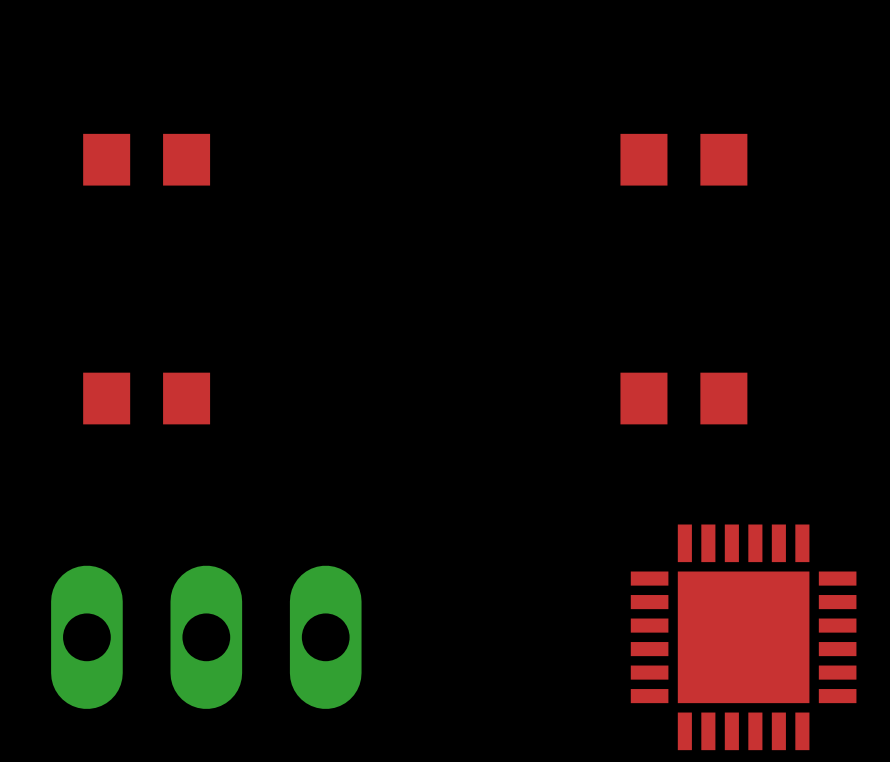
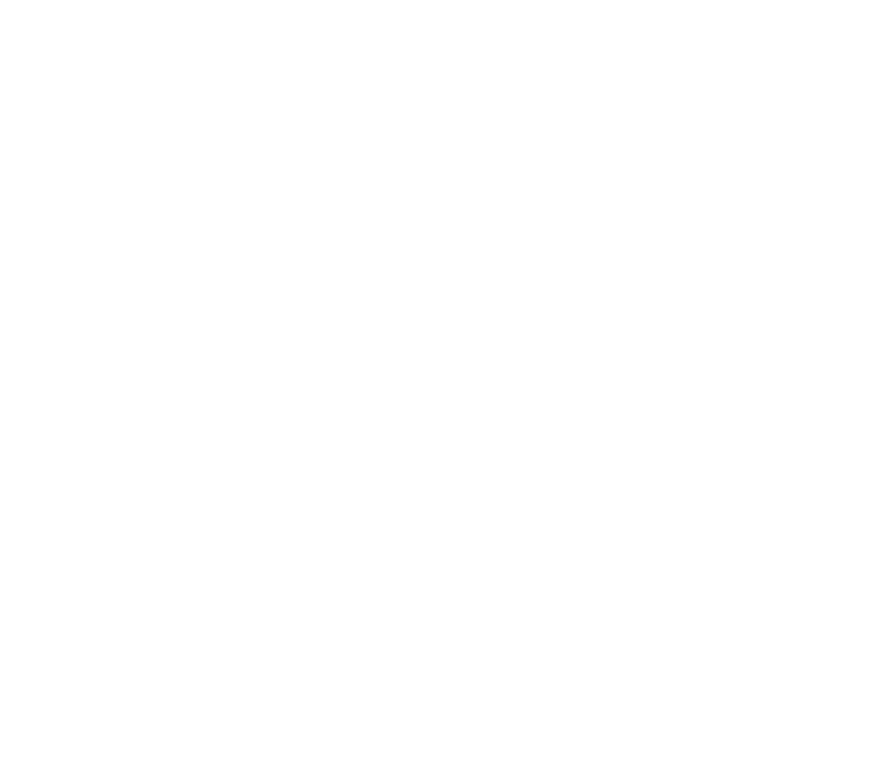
part: (146, 159) -> none
part: (683, 159) -> none
part: (146, 398) -> none
part: (683, 398) -> none
part: (206, 637) -> none
part: (743, 637) -> none

